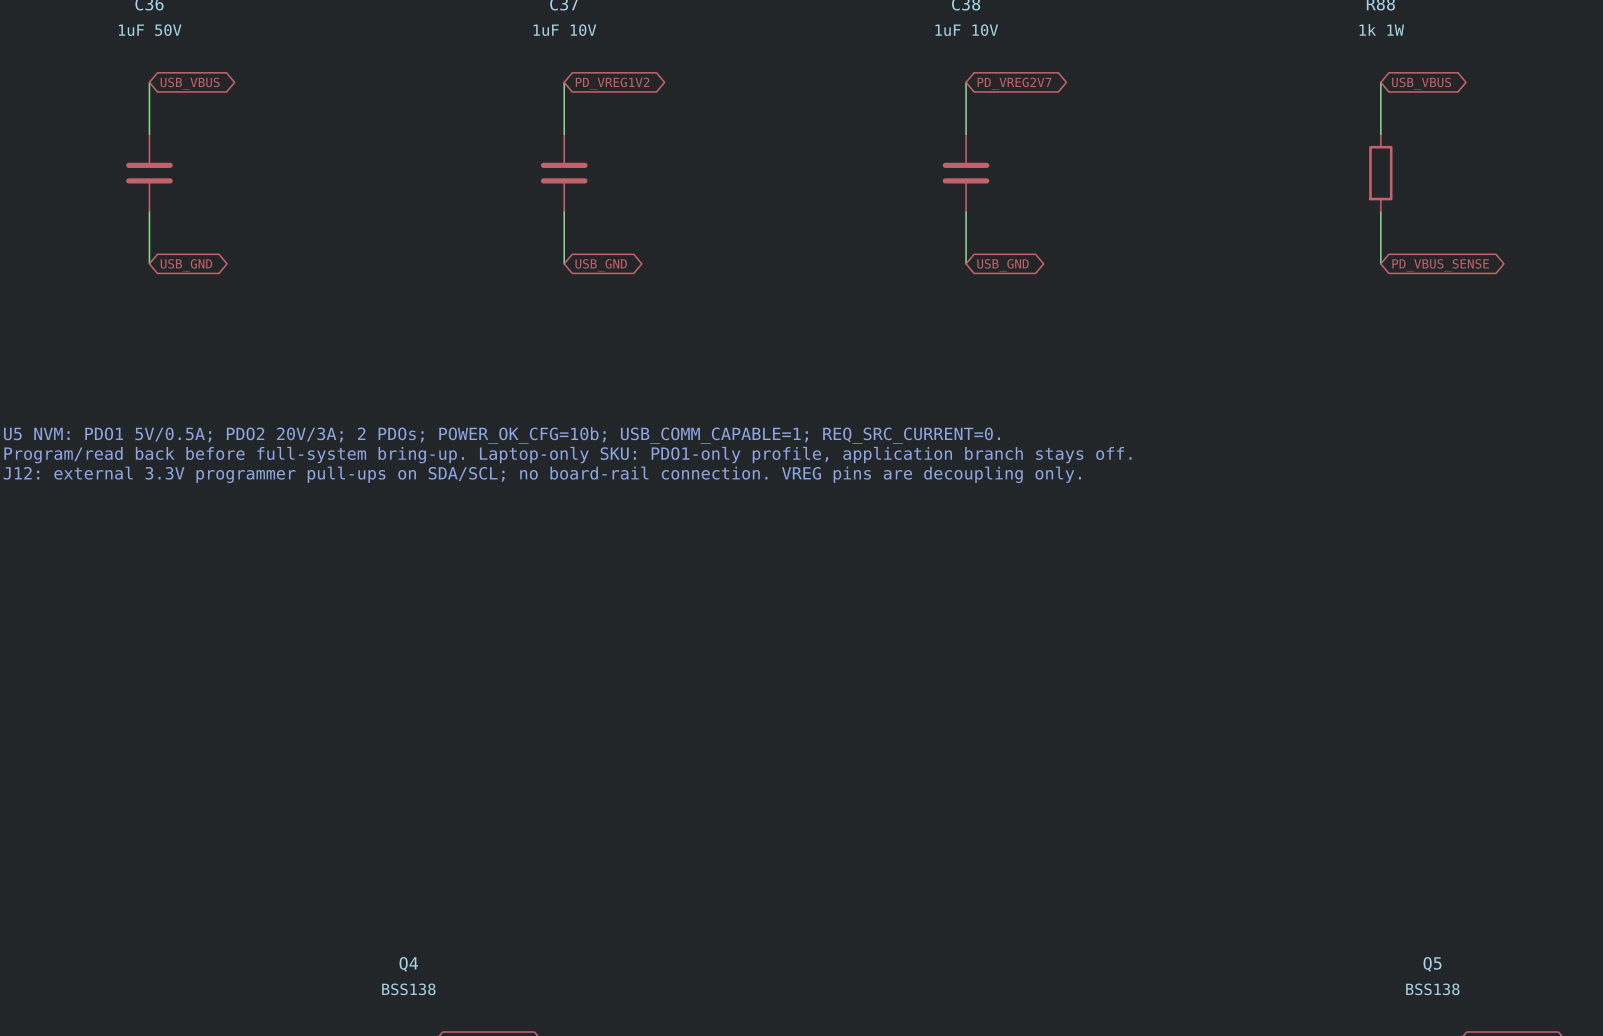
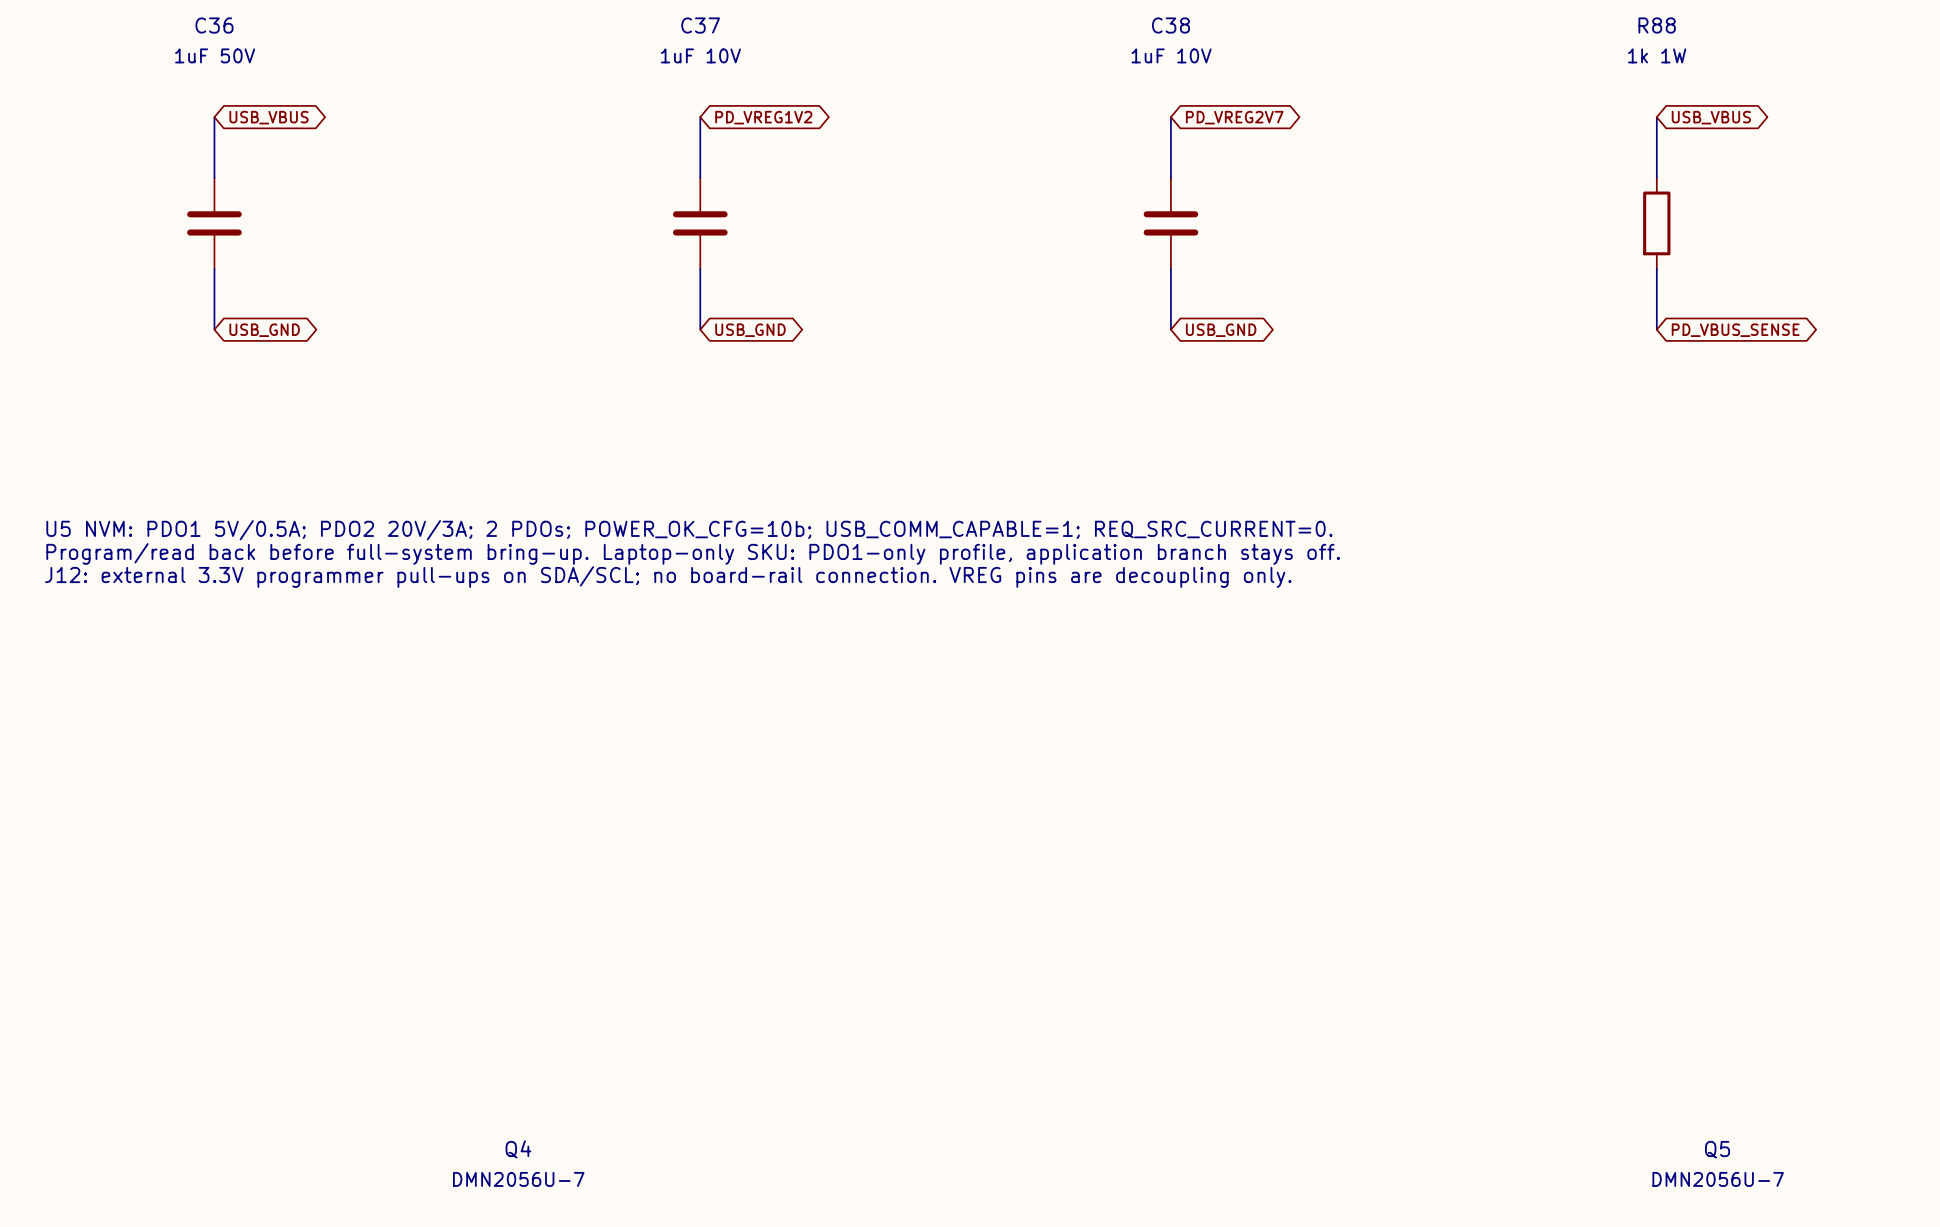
Q4 value: BSS138 (408, 989) -> DMN2056U-7 (518, 1179)
Q5 value: BSS138 (1432, 989) -> DMN2056U-7 (1718, 1179)

